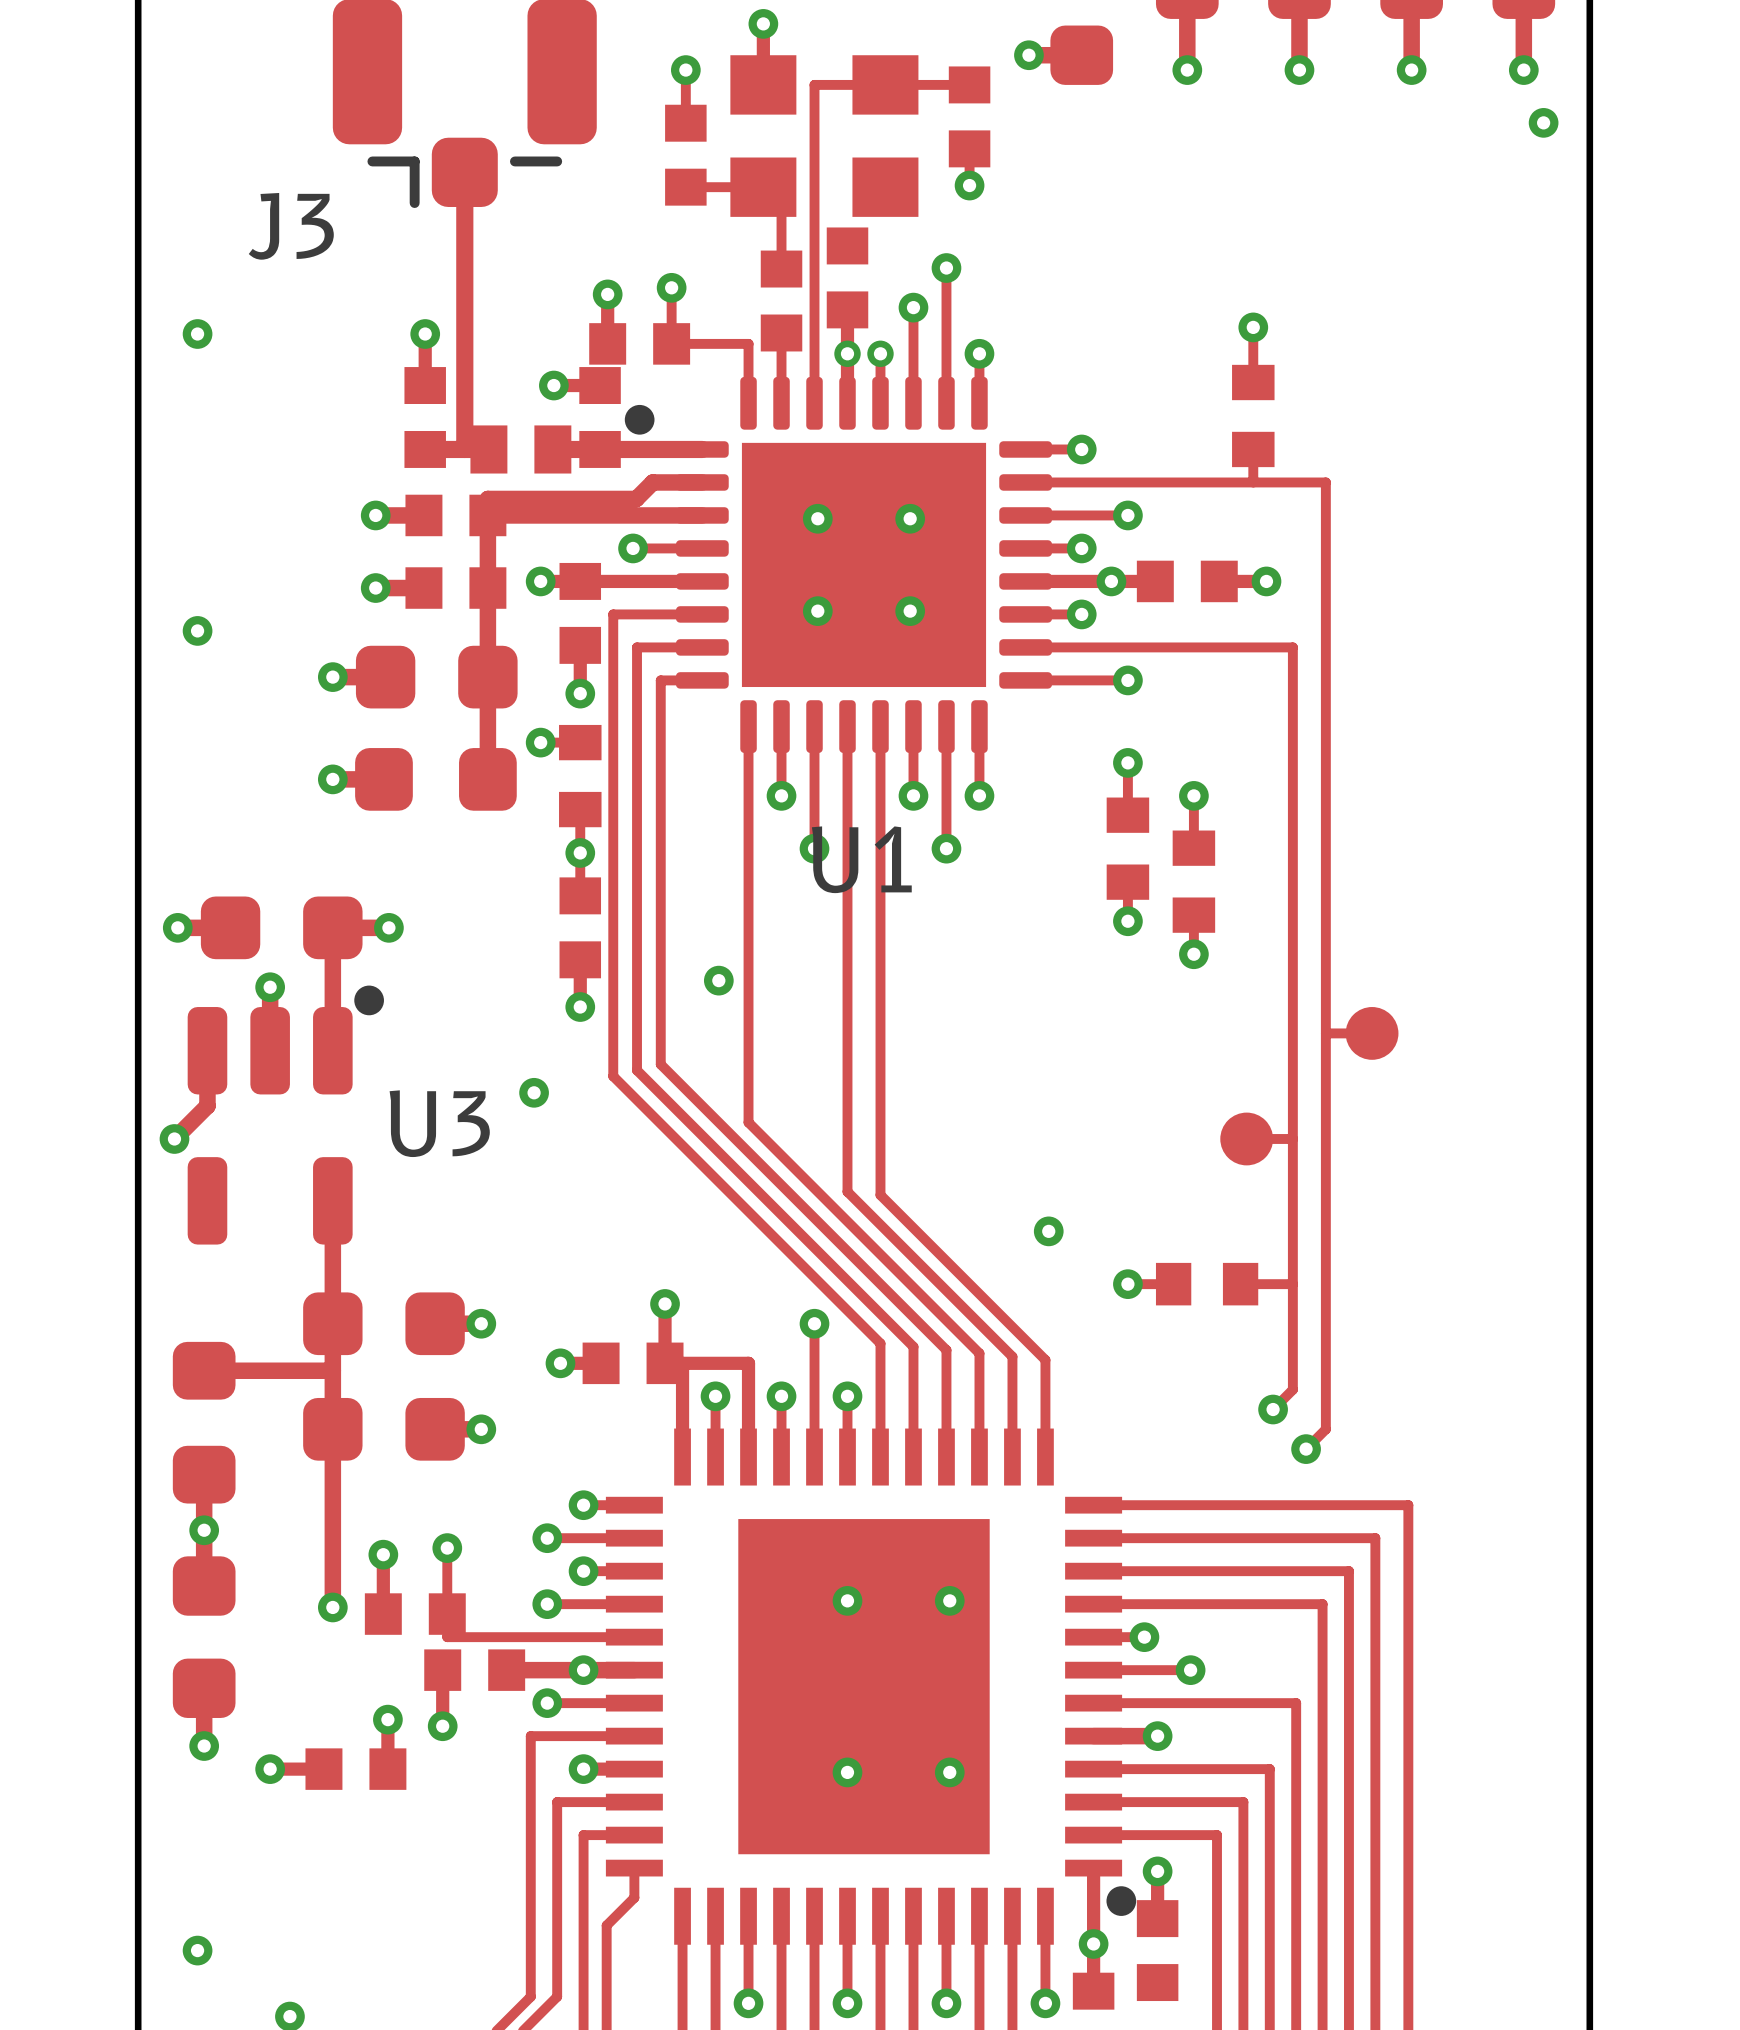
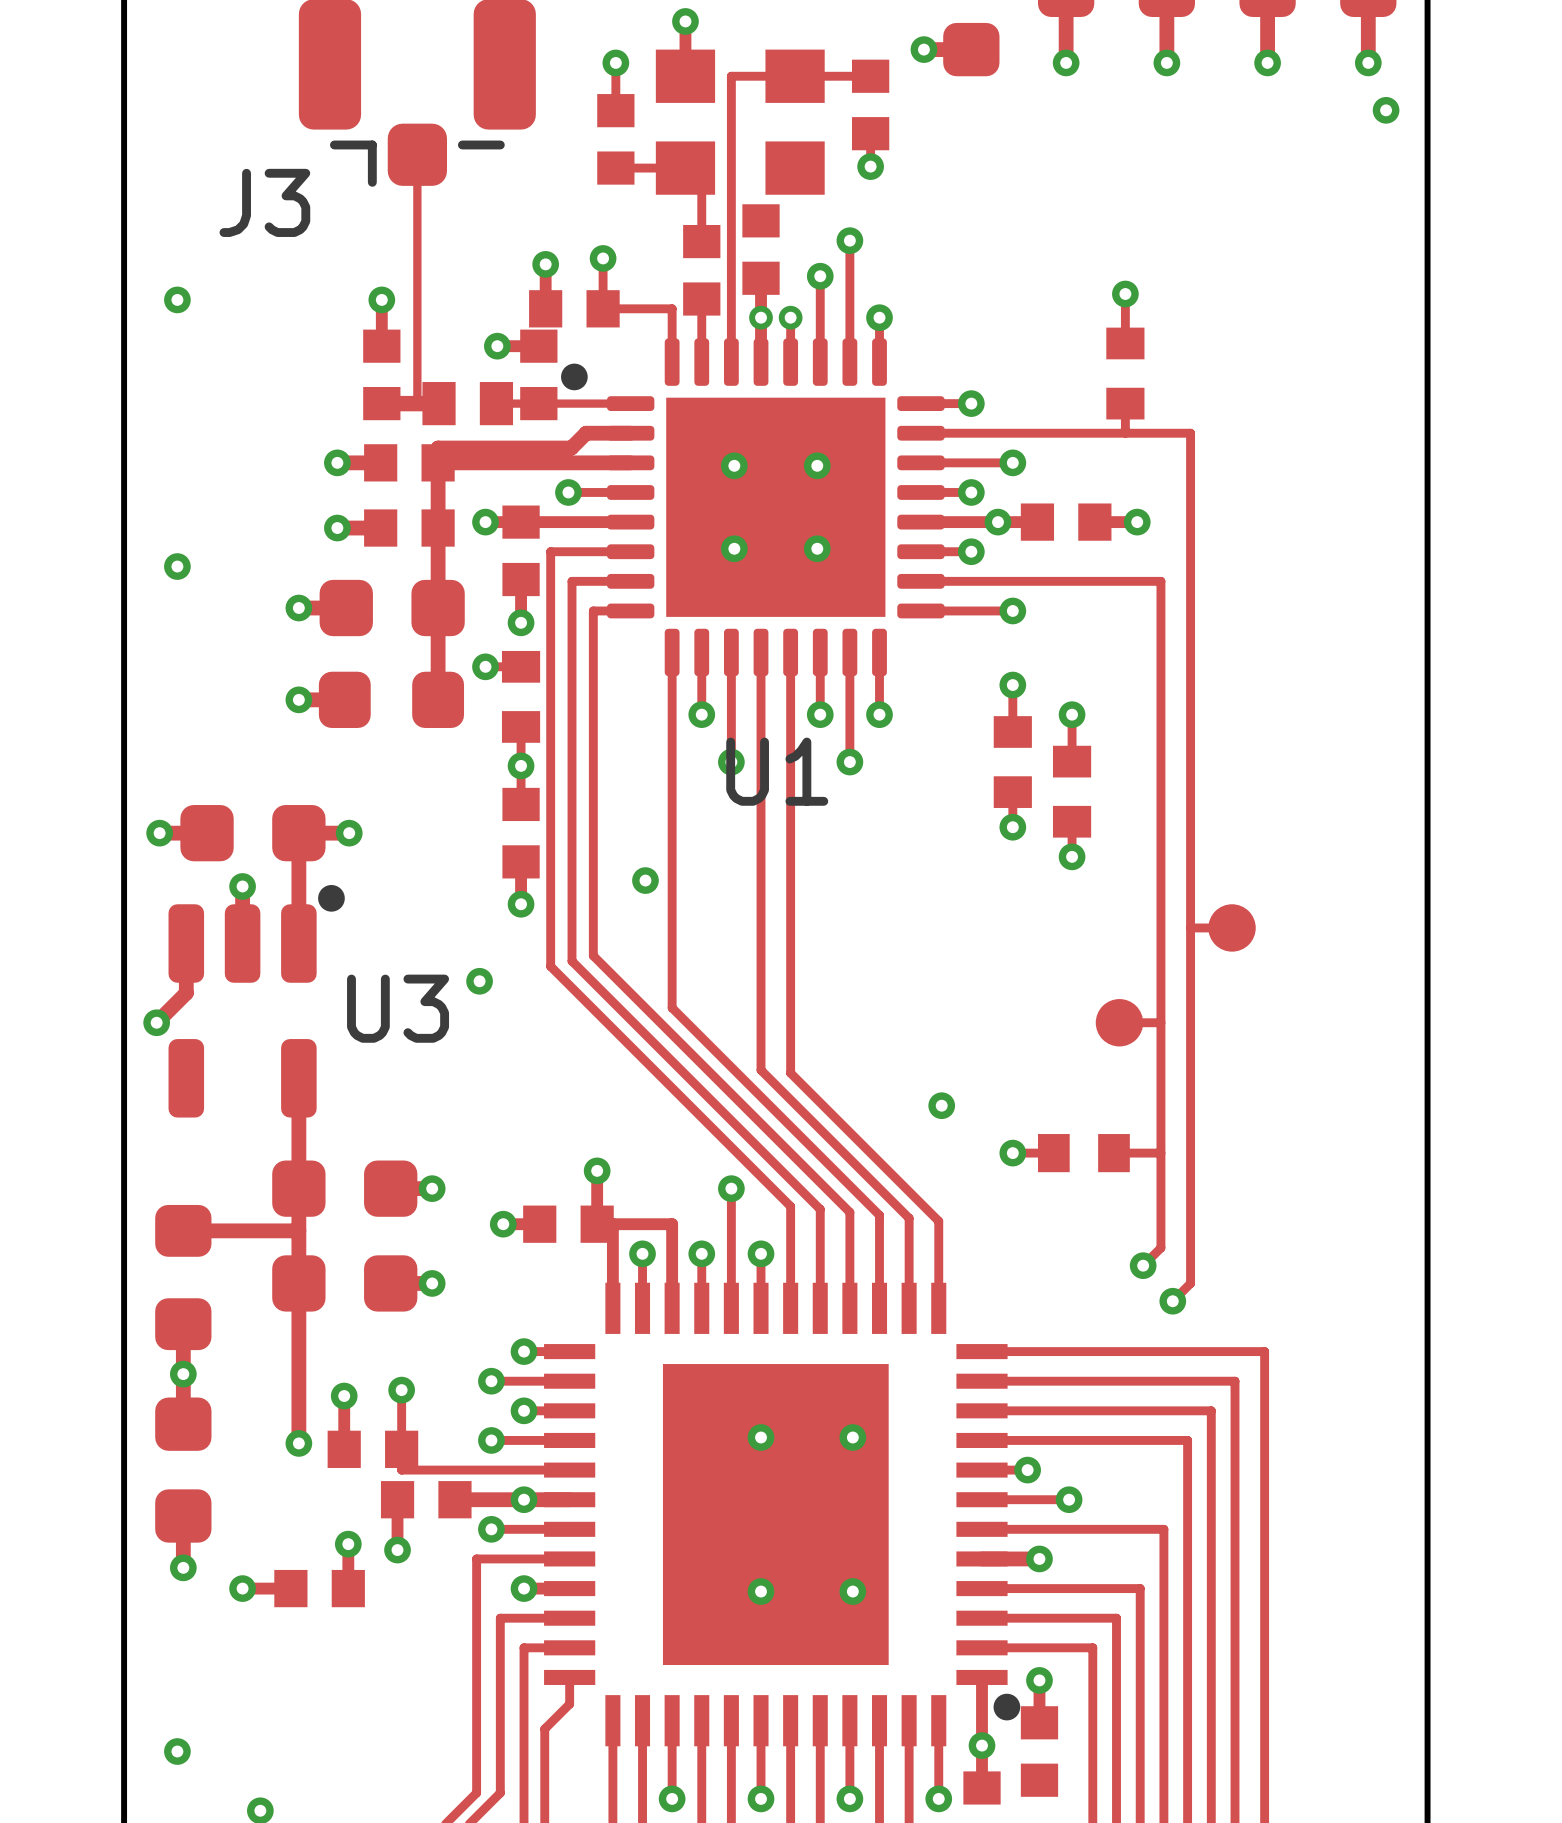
track width: thick (464, 172) (464, 449) -> thin (417, 154) (417, 403)
track width: thick (552, 449) (702, 449) -> thin (496, 403) (630, 403)

